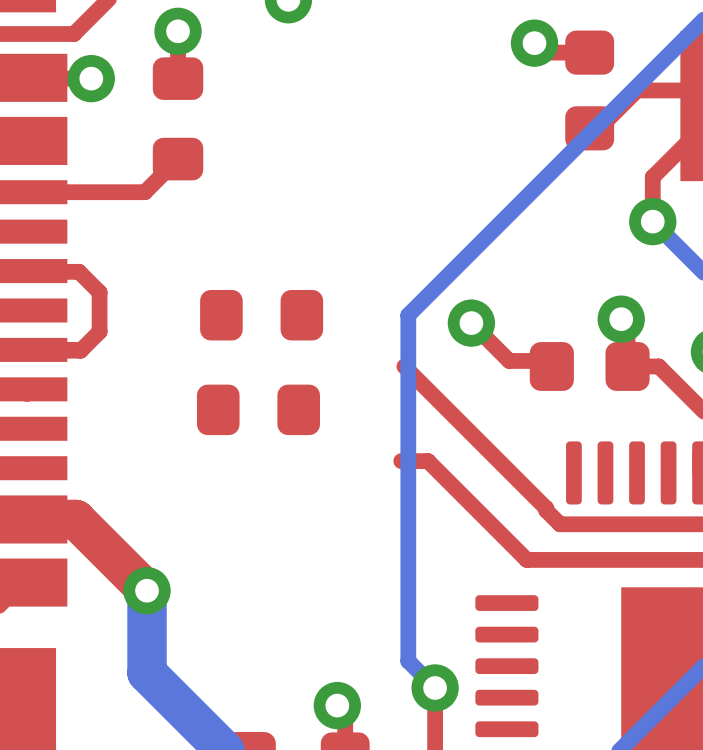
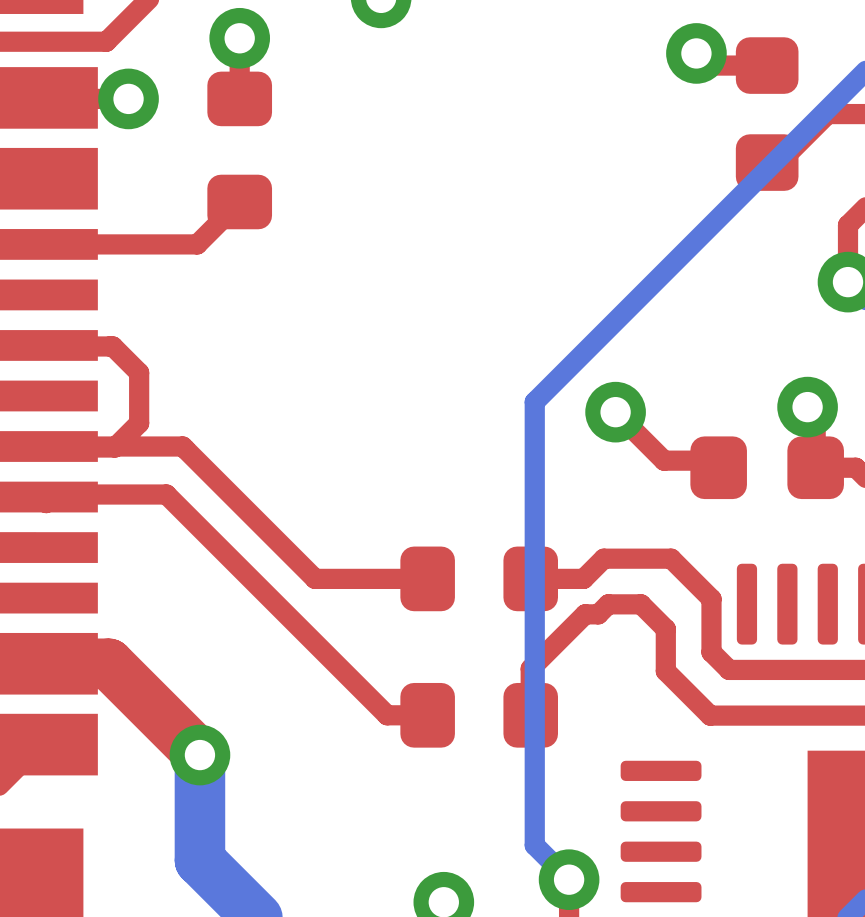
part: (261, 315) -> none
top track: none -> (115, 446) (182, 446) (315, 578) (427, 578)
top track: (404, 366) (546, 508) -> (530, 578) (583, 578) (603, 558) (671, 558) (711, 598) (711, 649)
top track: none -> (40, 497) (42, 494) (166, 494) (387, 715) (427, 715)
part: (258, 409) -> none
part: none -> (479, 578)
top track: (401, 461) (428, 461) (526, 559) (545, 559) -> (530, 715) (530, 668) (585, 614) (598, 614) (608, 604) (641, 604) (665, 629) (665, 671) (710, 715)
part: none -> (479, 715)

